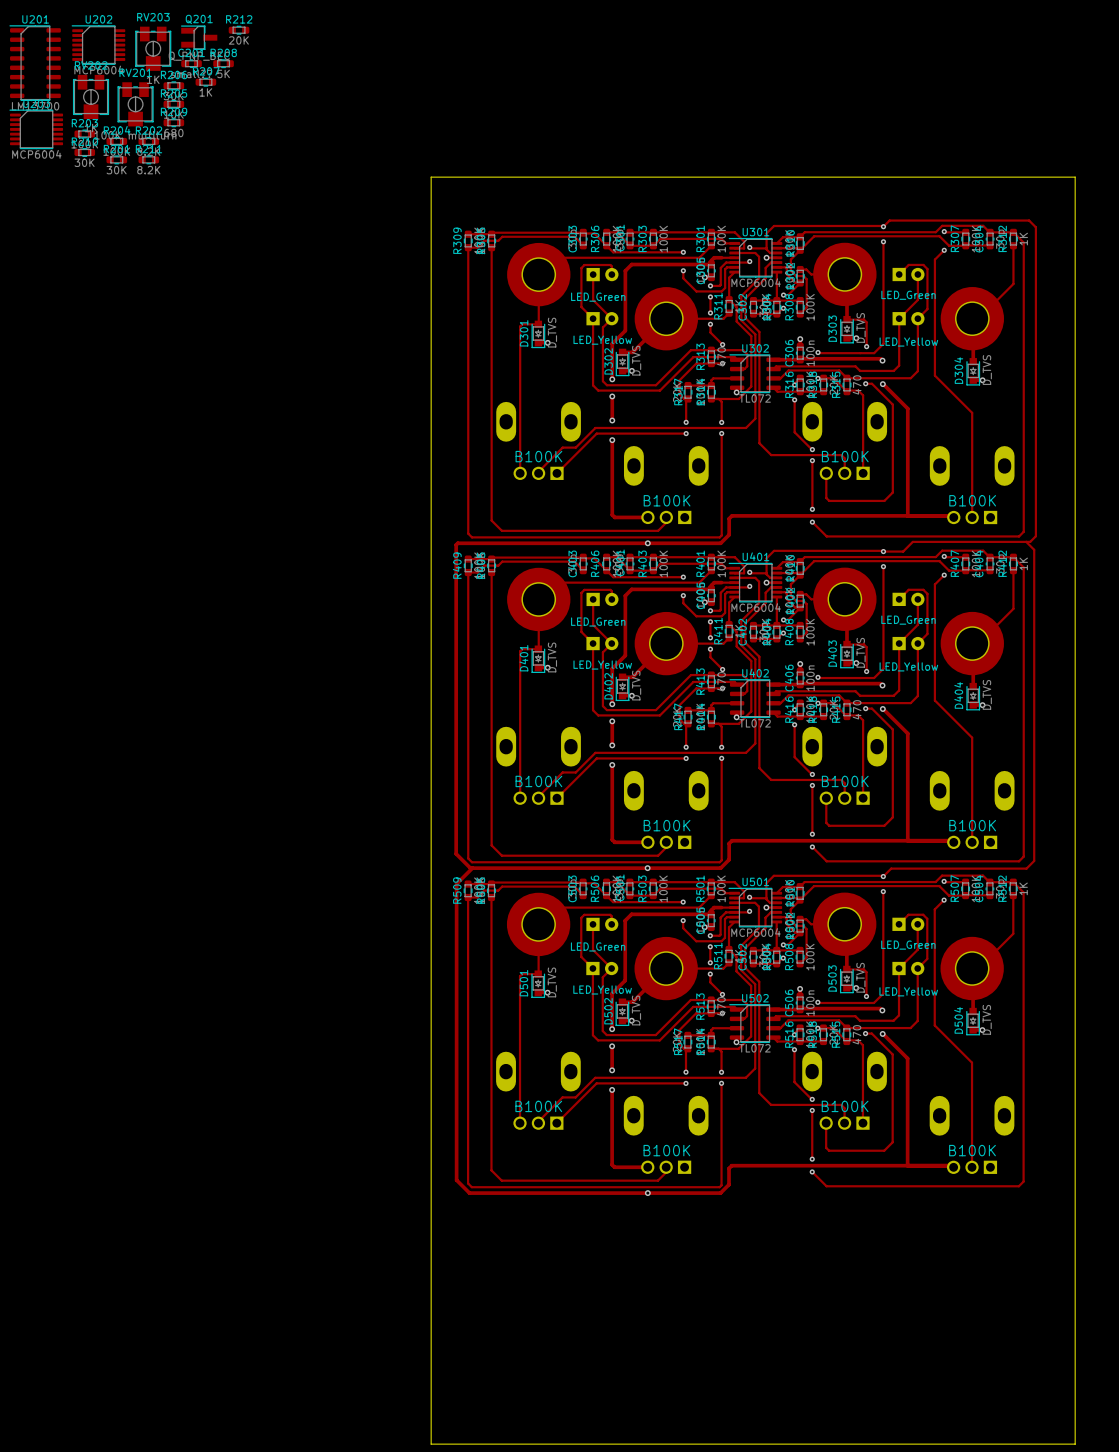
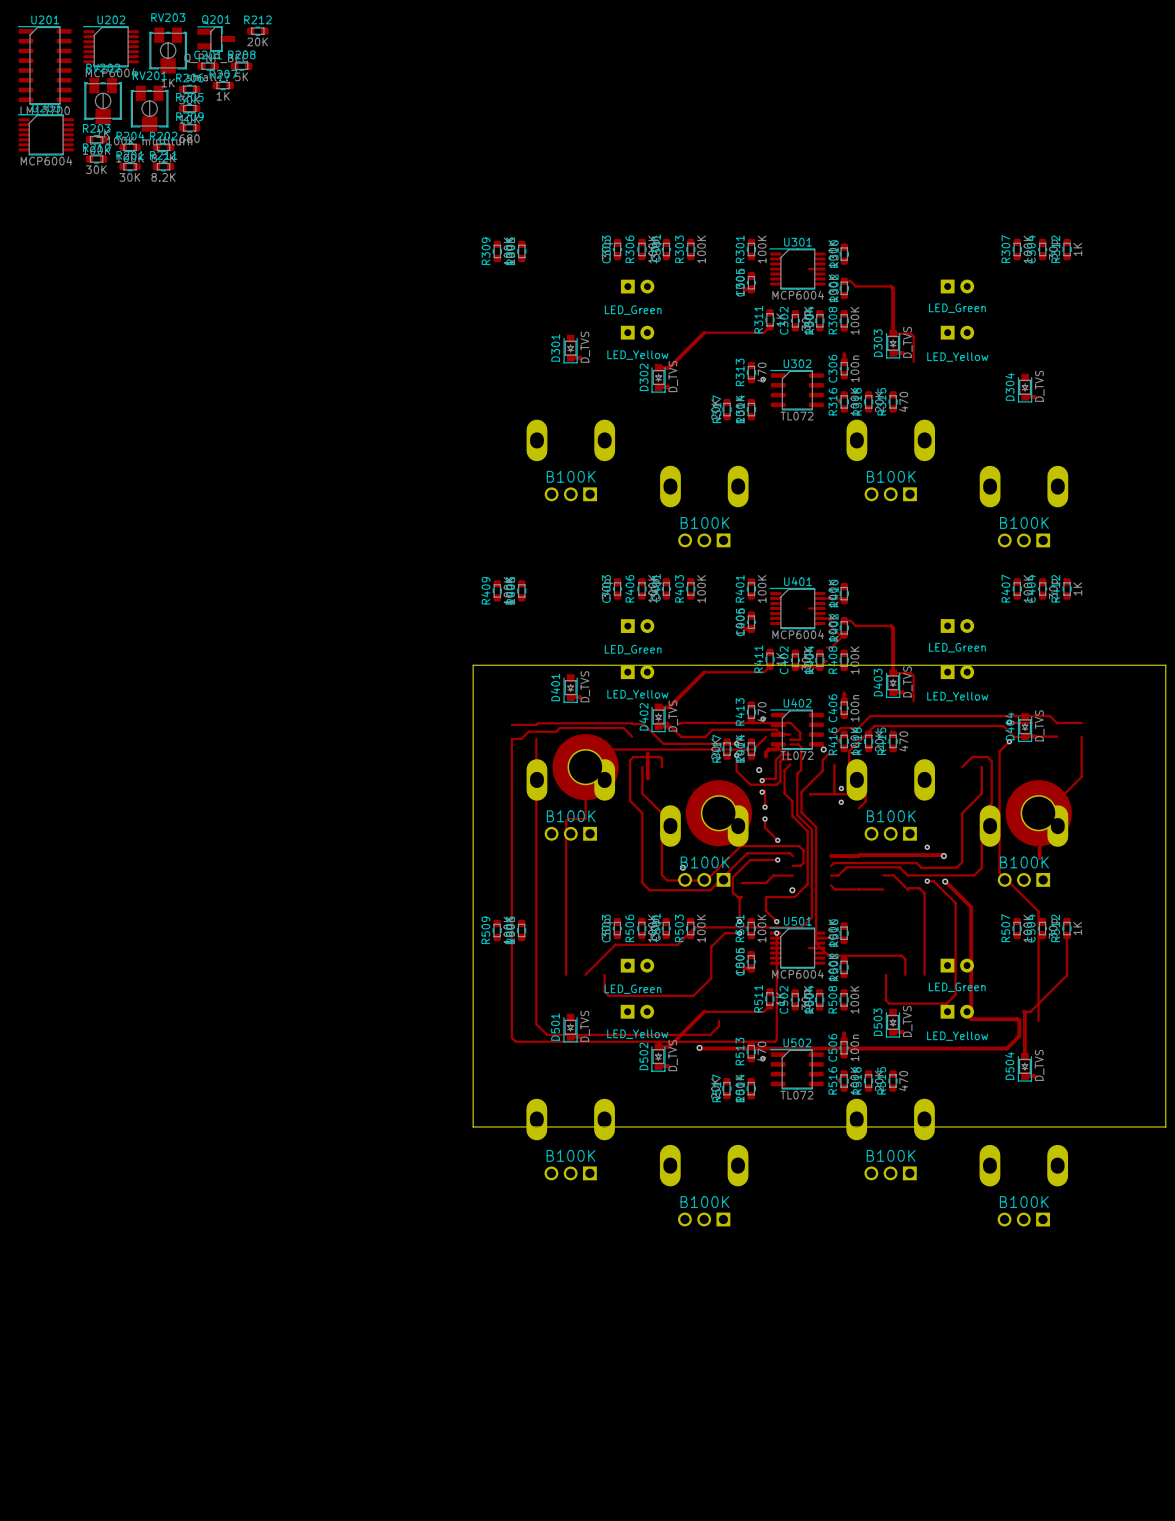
board edge: (431, 177) (1075, 177) (1075, 1444) (431, 1444) (431, 177) -> none
via: (883, 226) -> none
track: (944, 231) (965, 232) -> none
via: (944, 231) -> none
track: (606, 232) (616, 232) (630, 245) (653, 245) (660, 238) (721, 238) (726, 243) (734, 243) -> none
track: (628, 233) (734, 232) (744, 241) (744, 248) (734, 248) -> none
track: (468, 234) (594, 233) (613, 252) (683, 252) -> none
track: (883, 241) (883, 343) (874, 353) (818, 352) -> none
via: (883, 241) -> none
track: (776, 243) (783, 237) (799, 237) (804, 232) (935, 232) (942, 225) (983, 225) (990, 232) (1013, 232) (1023, 242) (1023, 531) (1019, 536) (826, 536) (812, 522) -> none
track: (583, 245) (574, 236) (502, 236) (498, 240) (484, 240) (477, 247) (468, 247) (468, 533) (472, 537) (719, 537) (721, 535) (721, 433) -> none
track: (711, 245) (699, 257) (555, 257) (538, 274) (538, 323) (522, 324) (520, 326) (520, 473) -> none
track: (990, 245) (949, 245) (939, 236) (814, 236) (790, 259) (790, 270) (796, 276) (803, 276) (806, 279) (806, 307) (800, 314) -> none
track: (1013, 245) (1013, 283) (978, 318) (972, 318) (973, 361) -> none
track: (491, 247) (491, 520) (501, 530) (658, 530) (666, 522) (666, 517) -> none
track: (749, 247) (766, 248) -> none
via: (749, 247) -> none
track: (776, 248) (798, 248) (800, 250) -> none
track: (944, 250) (934, 259) (934, 375) (972, 412) (972, 517) -> none
via: (944, 250) -> none
via: (683, 252) -> none
track: (734, 252) (755, 252) (759, 256) (759, 278) (741, 296) (741, 320) (755, 334) (755, 418) (746, 427) (595, 427) (575, 447) (562, 447) (538, 473) -> none
track: (776, 252) (770, 252) (766, 249) (766, 233) (774, 225) (883, 226) (889, 220) (1029, 220) (1035, 227) (1035, 536) (1030, 541) (912, 541) (903, 551) (774, 550) (766, 558) (766, 574) (770, 577) (776, 577) -> none
track: (734, 257) (714, 257) (711, 260) (711, 264) (631, 264) (625, 270) (625, 330) (612, 343) (612, 379) -> none
via: (766, 257) -> none
track: (749, 261) (726, 262) (720, 267) (720, 284) (710, 285) -> none
via: (749, 261) -> none
track: (776, 262) (771, 262) (765, 267) (765, 278) (745, 298) (745, 317) (759, 331) (759, 443) (771, 455) (841, 455) (844, 458) (844, 473) -> none
track: (734, 267) (727, 267) (725, 269) (725, 288) (721, 291) (696, 291) (683, 278) (683, 270) -> none
track: (776, 267) (785, 267) (786, 274) (795, 282) (800, 282) (788, 295) (783, 295) -> none
via: (683, 270) -> none
track: (734, 272) (729, 277) (729, 299) (736, 307) (736, 321) (751, 336) (751, 386) (738, 398) (711, 398) -> none
track: (776, 272) (776, 300) -> none
part: (538, 274) -> none
track: (593, 274) (593, 300) (611, 318) (602, 327) (602, 381) (606, 385) (655, 385) (691, 350) (743, 350) (747, 354) (747, 366) (744, 369) (737, 369) -> none
track: (611, 274) (610, 265) (584, 265) (581, 268) (581, 307) (593, 318) (593, 385) (598, 390) (659, 390) (693, 357) (734, 357) (737, 359) -> none
part: (844, 274) -> none
track: (899, 274) (908, 264) (923, 264) (927, 269) (927, 309) (917, 318) (917, 371) (910, 378) (847, 378) (839, 370) (788, 370) (780, 378) (773, 378) -> none
track: (917, 274) (917, 299) (899, 318) (899, 365) (893, 370) (860, 370) (855, 366) (776, 366) (773, 369) -> none
via: (704, 277) -> none
via: (710, 285) -> none
via: (783, 295) -> none
track: (710, 296) (710, 312) -> none
via: (710, 296) -> none
track: (800, 300) (753, 300) -> none
track: (783, 308) (776, 314) (753, 313) -> none
via: (783, 308) -> none
via: (710, 312) -> none
part: (666, 318) -> none
part: (972, 318) -> none
track: (710, 324) (710, 332) (722, 344) -> none
via: (710, 324) -> none
via: (856, 338) -> none
via: (800, 339) -> none
via: (547, 342) -> none
via: (722, 344) -> none
via: (866, 346) -> none
via: (818, 352) -> none
track: (773, 359) (880, 358) (882, 360) -> none
via: (882, 360) -> none
track: (722, 363) (696, 363) (679, 380) (679, 394) (684, 398) (688, 398) (686, 400) (686, 422) -> none
via: (631, 370) -> none
track: (737, 378) (713, 378) (711, 385) (688, 385) -> none
track: (818, 378) (833, 378) (847, 391) (858, 390) (863, 395) (863, 473) -> none
via: (818, 378) -> none
via: (612, 379) -> none
via: (982, 380) -> none
track: (865, 383) (871, 383) (892, 404) (892, 492) (884, 500) (829, 500) (826, 498) (826, 473) -> none
via: (865, 383) -> none
track: (882, 384) (907, 408) (907, 515) -> none
via: (882, 384) -> none
via: (794, 385) -> none
track: (773, 387) (777, 391) (823, 391) -> none
via: (736, 392) -> none
track: (612, 396) (612, 420) -> none
via: (612, 396) -> none
track: (718, 398) (721, 401) (721, 422) -> none
track: (794, 399) (794, 432) (812, 449) -> none
via: (794, 399) -> none
via: (612, 420) -> none
via: (686, 422) -> none
via: (721, 422) -> none
track: (686, 433) (596, 433) (556, 473) -> none
via: (686, 433) -> none
via: (721, 433) -> none
track: (612, 440) (612, 514) (614, 517) (647, 517) -> none
via: (612, 440) -> none
via: (812, 449) -> none
track: (812, 460) (812, 509) -> none
via: (812, 460) -> none
via: (812, 509) -> none
track: (953, 517) (952, 515) (731, 515) (729, 518) (729, 534) (720, 543) (457, 543) (456, 544) (456, 853) (470, 868) (720, 868) (729, 859) (729, 843) (731, 840) (952, 840) (953, 842) -> none
via: (812, 522) -> none
track: (1026, 541) (1034, 549) (1034, 860) (1026, 868) (891, 868) (883, 876) (773, 875) (766, 883) (766, 899) (769, 902) (776, 902) -> none
via: (647, 543) -> none
via: (883, 551) -> none
track: (944, 556) (965, 557) -> (1009, 722) (1031, 722)
via: (944, 556) -> none
track: (606, 557) (616, 557) (630, 570) (653, 570) (660, 563) (721, 563) (726, 568) (734, 568) -> (656, 722) (667, 722) (681, 737) (705, 737) (712, 729) (776, 729) (781, 734) (790, 734)
track: (628, 558) (734, 557) (744, 566) (744, 573) (734, 573) -> (679, 724) (790, 722) (800, 732) (800, 739) (790, 739)
track: (468, 559) (594, 558) (613, 577) (683, 577) -> (511, 724) (643, 724) (663, 743) (736, 743)
track: (883, 566) (883, 668) (874, 678) (818, 677) -> none
via: (883, 566) -> none
track: (776, 568) (783, 562) (799, 562) (804, 557) (935, 557) (942, 550) (983, 550) (990, 557) (1013, 557) (1023, 567) (1023, 856) (1019, 861) (826, 861) (812, 847) -> none
track: (583, 570) (574, 561) (502, 561) (498, 565) (484, 565) (477, 572) (468, 572) (468, 858) (471, 862) (719, 862) (721, 860) (721, 758) -> none
track: (711, 570) (699, 582) (555, 582) (538, 599) (538, 648) (522, 649) (520, 651) (520, 798) -> (766, 737) (753, 749) (603, 749) (585, 767) (585, 818) (568, 819) (566, 821) (566, 974)
track: (990, 570) (949, 570) (939, 561) (814, 561) (790, 584) (790, 595) (796, 600) (803, 600) (806, 604) (806, 632) (800, 638) -> none
track: (1013, 570) (1013, 608) (978, 643) (972, 643) (973, 686) -> (1081, 737) (1081, 776) (1045, 813) (1038, 813) (1039, 858)
track: (491, 572) (491, 845) (501, 855) (658, 855) (666, 847) (666, 842) -> (536, 738) (536, 1024) (547, 1034) (710, 1034) (718, 1026) (718, 1020)
track: (749, 572) (766, 573) -> none
via: (749, 572) -> none
track: (944, 575) (934, 584) (934, 700) (972, 737) (972, 842) -> (1009, 741) (999, 751) (999, 872) (1038, 911) (1038, 1020)
via: (944, 575) -> none
via: (683, 577) -> none
track: (734, 577) (755, 577) (759, 581) (759, 603) (741, 620) (741, 645) (755, 659) (755, 743) (745, 752) (595, 752) (575, 772) (562, 772) (538, 798) -> none
track: (734, 582) (714, 582) (711, 585) (711, 589) (631, 589) (625, 595) (625, 655) (612, 668) (612, 704) -> none
via: (766, 582) -> none
track: (749, 586) (726, 587) (720, 592) (720, 609) (710, 610) -> none
via: (749, 586) -> none
track: (776, 587) (771, 587) (765, 592) (765, 603) (745, 623) (745, 642) (759, 656) (759, 768) (771, 779) (841, 779) (844, 783) (844, 798) -> (834, 754) (828, 754) (822, 760) (822, 770) (801, 792) (801, 812) (816, 827) (816, 943) (828, 955) (901, 955) (905, 959) (905, 974)
track: (734, 592) (727, 592) (725, 594) (725, 612) (721, 616) (696, 616) (683, 603) (683, 595) -> none
via: (683, 595) -> none
track: (734, 597) (729, 602) (729, 624) (736, 632) (736, 646) (751, 661) (751, 711) (738, 723) (711, 723) -> none
track: (776, 597) (776, 625) -> (834, 764) (834, 794)
part: (538, 599) -> none
track: (593, 599) (593, 624) (611, 643) (602, 652) (602, 706) (606, 710) (655, 710) (690, 675) (743, 675) (747, 679) (747, 691) (744, 693) (737, 693) -> none
track: (611, 599) (610, 589) (584, 589) (581, 592) (581, 631) (593, 643) (593, 710) (598, 715) (659, 715) (693, 681) (734, 681) (737, 684) -> none
part: (844, 599) -> none
track: (899, 599) (908, 589) (923, 589) (927, 593) (927, 633) (917, 643) (917, 695) (910, 703) (846, 703) (839, 695) (788, 695) (780, 703) (773, 703) -> (962, 767) (972, 757) (987, 757) (991, 761) (991, 803) (981, 813) (981, 867) (974, 875) (907, 875) (899, 867) (846, 867) (838, 875) (830, 875)
track: (917, 599) (917, 624) (899, 643) (899, 690) (893, 695) (860, 695) (855, 691) (776, 691) (773, 693) -> (981, 767) (981, 793) (962, 813) (962, 862) (956, 867) (921, 867) (916, 863) (833, 863) (830, 865)
via: (704, 602) -> none
via: (710, 610) -> none
via: (783, 619) -> none
track: (710, 621) (710, 637) -> (765, 790) (765, 807)
via: (710, 621) -> none
track: (800, 625) (753, 625) -> (858, 794) (809, 794)
via: (783, 633) -> none
board edge: none -> (473, 665) (1165, 665) (1165, 1126) (473, 1126) (473, 665)
via: (710, 637) -> none
part: (666, 643) -> none
part: (972, 643) -> none
track: (710, 649) (710, 657) (722, 669) -> (765, 819) (765, 827) (777, 840)
via: (710, 649) -> none
via: (856, 663) -> none
via: (800, 664) -> none
via: (547, 667) -> none
via: (722, 669) -> none
via: (866, 671) -> none
via: (818, 677) -> none
track: (773, 684) (880, 683) (882, 685) -> none
via: (882, 685) -> none
track: (722, 688) (696, 688) (679, 705) (679, 719) (684, 723) (688, 723) (686, 725) (686, 747) -> (777, 859) (750, 860) (732, 877) (732, 892) (737, 897) (741, 897) (739, 899) (739, 921)
via: none -> (1009, 722)
track: none -> (1081, 722) (1057, 723) (1050, 716) (870, 716) (858, 728) (840, 728) (834, 734)
via: (631, 695) -> none
track: (737, 703) (713, 703) (711, 710) (688, 710) -> none
track: (818, 703) (833, 703) (846, 716) (858, 715) (863, 720) (863, 798) -> none
via: (818, 703) -> none
via: (612, 704) -> none
track: none -> (632, 736) (623, 728) (559, 728) (556, 731) (528, 731) (521, 738) (511, 738) (511, 1037) (515, 1041) (774, 1041) (776, 1039) (776, 933)
via: (982, 705) -> none
track: none -> (1057, 736) (1014, 737) (1003, 726) (874, 726) (849, 751) (849, 763) (854, 768) (862, 768) (865, 771) (865, 801) (858, 808)
track: (865, 708) (871, 708) (892, 729) (892, 817) (884, 825) (829, 825) (826, 822) (826, 798) -> (927, 881) (933, 881) (955, 902) (955, 994) (946, 1003) (889, 1003) (886, 1000) (886, 974)
via: (865, 708) -> none
track: (882, 708) (907, 733) (907, 840) -> none
via: (882, 708) -> none
via: (794, 709) -> none
via: none -> (1009, 741)
via: none -> (736, 743)
track: none -> (790, 744) (798, 744) (801, 747) (801, 770) (797, 773) (797, 815) (811, 829) (811, 917) (802, 927) (695, 927) (677, 944) (615, 944) (585, 974)
track: (773, 712) (777, 716) (823, 716) -> (830, 885) (835, 889) (883, 889)
via: (736, 717) -> none
track: none -> (790, 749) (768, 749) (766, 752) (766, 756)
via: none -> (823, 749)
via: (612, 721) -> none
track: none -> (790, 754) (781, 754) (775, 760) (774, 778) (765, 778)
track: none -> (736, 755) (736, 771) (750, 784) (776, 784) (780, 781) (780, 761) (782, 759) (790, 759)
via: none -> (736, 755)
track: (718, 723) (721, 726) (721, 747) -> none
track: (794, 724) (794, 757) (812, 774) -> none
via: (794, 724) -> none
track: none -> (790, 764) (784, 770) (784, 793) (792, 801) (792, 816) (807, 831) (807, 884) (794, 897) (766, 897) (766, 910) (776, 921)
part: none -> (585, 767)
track: none -> (642, 767) (642, 793) (661, 813) (661, 875) (667, 880) (706, 880) (740, 846) (799, 846) (803, 850) (803, 862) (800, 865) (792, 865)
track: none -> (661, 767) (660, 757) (633, 757) (630, 760) (630, 800) (642, 813) (642, 882) (649, 890) (710, 890) (747, 853) (790, 853) (792, 856)
via: none -> (759, 770)
via: (612, 745) -> none
via: (686, 747) -> none
via: none -> (841, 788)
track: (686, 758) (596, 758) (556, 798) -> none
via: (686, 758) -> none
track: (612, 765) (612, 839) (614, 842) (647, 842) -> none
via: (612, 765) -> none
via: none -> (841, 802)
via: none -> (765, 807)
via: (812, 774) -> none
part: none -> (718, 813)
part: none -> (1038, 813)
via: none -> (765, 819)
track: (812, 785) (812, 834) -> none
via: (812, 785) -> none
via: none -> (777, 840)
via: none -> (927, 847)
track: none -> (830, 856) (943, 856)
via: none -> (943, 856)
via: none -> (777, 859)
via: none -> (682, 867)
via: (812, 834) -> none
track: none -> (792, 875) (773, 875) (766, 883) (741, 883)
track: none -> (883, 875) (893, 875) (907, 889) (919, 888) (924, 893) (924, 974)
via: none -> (927, 881)
track: none -> (945, 881) (971, 907) (971, 1019) (1017, 1019) (1019, 1020) (1019, 1036) (1006, 1048) (699, 1047)
via: none -> (945, 881)
via: (812, 847) -> none
via: none -> (792, 890)
track: (472, 868) (456, 884) (456, 1180) (469, 1193) (720, 1193) (729, 1184) (729, 1168) (731, 1165) (951, 1165) (953, 1167) -> none
via: (647, 868) -> none
via: (883, 876) -> none
track: (944, 881) (965, 882) -> none
via: (944, 881) -> none
track: (606, 882) (616, 882) (630, 895) (653, 895) (660, 888) (721, 888) (725, 893) (734, 893) -> none
via: none -> (739, 921)
via: none -> (776, 921)
track: (628, 883) (734, 882) (743, 891) (743, 898) (734, 898) -> none
track: (468, 884) (594, 883) (613, 902) (683, 902) -> none
track: (883, 891) (883, 993) (873, 1002) (817, 1002) -> none
via: (883, 891) -> none
track: none -> (739, 933) (724, 933) (711, 946) (711, 978) (693, 995) (608, 995) (604, 991) (604, 974)
via: none -> (739, 933)
via: none -> (776, 933)
track: (776, 893) (782, 887) (799, 887) (804, 882) (935, 882) (942, 875) (983, 875) (989, 882) (1013, 882) (1023, 892) (1023, 1181) (1018, 1186) (826, 1186) (812, 1171) -> none
track: (583, 895) (574, 886) (502, 886) (498, 890) (484, 890) (477, 897) (468, 897) (468, 1183) (471, 1187) (719, 1187) (721, 1185) (721, 1083) -> none
track: (711, 895) (699, 907) (555, 907) (538, 924) (538, 973) (522, 974) (520, 976) (520, 1123) -> none
track: (989, 895) (948, 895) (939, 886) (814, 886) (790, 909) (790, 920) (795, 925) (803, 925) (806, 929) (806, 957) (800, 963) -> none
track: (491, 897) (491, 1170) (501, 1180) (657, 1180) (666, 1172) (666, 1167) -> none
track: (749, 897) (766, 898) -> none
via: (749, 897) -> none
track: (944, 900) (934, 909) (934, 1025) (972, 1062) (972, 1167) -> none
via: (944, 900) -> none
via: (683, 902) -> none
track: (734, 902) (755, 902) (758, 906) (758, 928) (741, 945) (741, 970) (755, 984) (755, 1068) (745, 1077) (595, 1077) (575, 1097) (562, 1097) (538, 1123) -> none
track: (734, 907) (714, 907) (711, 910) (711, 914) (631, 914) (625, 920) (625, 980) (612, 993) (612, 1029) -> none
via: (766, 907) -> none
track: (749, 911) (725, 912) (720, 917) (720, 934) (710, 935) -> none
via: (749, 911) -> none
track: (776, 912) (770, 912) (765, 917) (765, 928) (745, 948) (745, 967) (759, 981) (759, 1093) (771, 1104) (841, 1104) (844, 1108) (844, 1123) -> none
track: (734, 917) (726, 917) (724, 919) (724, 937) (721, 941) (696, 941) (683, 928) (683, 920) -> none
track: (776, 917) (785, 917) (786, 924) (795, 932) (800, 932) (787, 944) (783, 944) -> none
track: (800, 919) (806, 919) (811, 924) (844, 924) (846, 926) (846, 969) (863, 969) (866, 972) (866, 996) -> none
via: (683, 920) -> none
track: (734, 921) (729, 927) (729, 949) (736, 956) (736, 971) (751, 985) (751, 1036) (738, 1048) (711, 1048) -> none
track: (776, 921) (776, 950) -> none
part: (538, 924) -> none
track: (593, 924) (593, 949) (611, 968) (602, 977) (602, 1031) (606, 1035) (655, 1035) (690, 1000) (742, 1000) (747, 1004) (747, 1016) (744, 1018) (736, 1018) -> none
track: (611, 924) (610, 914) (584, 914) (581, 917) (581, 956) (592, 968) (592, 1035) (598, 1040) (659, 1040) (693, 1006) (734, 1006) (736, 1009) -> none
part: (844, 924) -> none
track: (899, 924) (908, 914) (923, 914) (927, 918) (927, 958) (917, 968) (917, 1020) (910, 1028) (846, 1028) (839, 1020) (788, 1020) (780, 1028) (773, 1028) -> none
track: (917, 924) (917, 949) (899, 968) (899, 1015) (893, 1020) (859, 1020) (855, 1016) (776, 1016) (773, 1018) -> none
via: (704, 927) -> none
via: (710, 935) -> none
via: (783, 944) -> none
track: (710, 946) (710, 962) -> none
via: (710, 946) -> none
track: (800, 950) (753, 950) -> none
track: (783, 958) (776, 963) (753, 963) -> none
via: (783, 958) -> none
via: (710, 962) -> none
part: (666, 968) -> none
part: (972, 968) -> none
track: (710, 974) (710, 982) (722, 994) -> none
via: (710, 974) -> none
via: (800, 988) -> none
via: (856, 988) -> none
via: (547, 992) -> none
via: (722, 994) -> none
via: (866, 996) -> none
via: (817, 1002) -> none
via: none -> (699, 1047)
track: (773, 1009) (880, 1008) (882, 1010) -> none
via: (882, 1010) -> none
track: (722, 1013) (696, 1013) (679, 1030) (679, 1044) (684, 1048) (687, 1048) (685, 1050) (685, 1072) -> none
via: (631, 1020) -> none
track: (736, 1028) (713, 1028) (711, 1035) (687, 1035) -> none
track: (817, 1028) (833, 1028) (846, 1041) (858, 1040) (862, 1045) (862, 1123) -> none
via: (817, 1028) -> none
via: (612, 1029) -> none
via: (982, 1030) -> none
track: (865, 1033) (871, 1033) (892, 1054) (892, 1142) (884, 1150) (829, 1150) (826, 1147) (826, 1123) -> none
via: (865, 1033) -> none
track: (882, 1033) (907, 1058) (907, 1165) -> none
via: (882, 1033) -> none
via: (794, 1034) -> none
track: (773, 1037) (777, 1041) (823, 1041) -> none
via: (736, 1042) -> none
track: (612, 1046) (612, 1070) -> none
via: (612, 1046) -> none
track: (718, 1048) (721, 1051) (721, 1072) -> none
track: (794, 1049) (794, 1082) (812, 1099) -> none
via: (794, 1049) -> none
via: (612, 1070) -> none
via: (685, 1072) -> none
via: (721, 1072) -> none
track: (685, 1083) (596, 1083) (556, 1123) -> none
via: (685, 1083) -> none
via: (721, 1083) -> none
track: (612, 1089) (612, 1164) (614, 1167) (647, 1167) -> none
via: (612, 1089) -> none
via: (812, 1099) -> none
track: (812, 1110) (812, 1159) -> none
via: (812, 1110) -> none
via: (812, 1159) -> none
via: (812, 1171) -> none
via: (647, 1193) -> none

